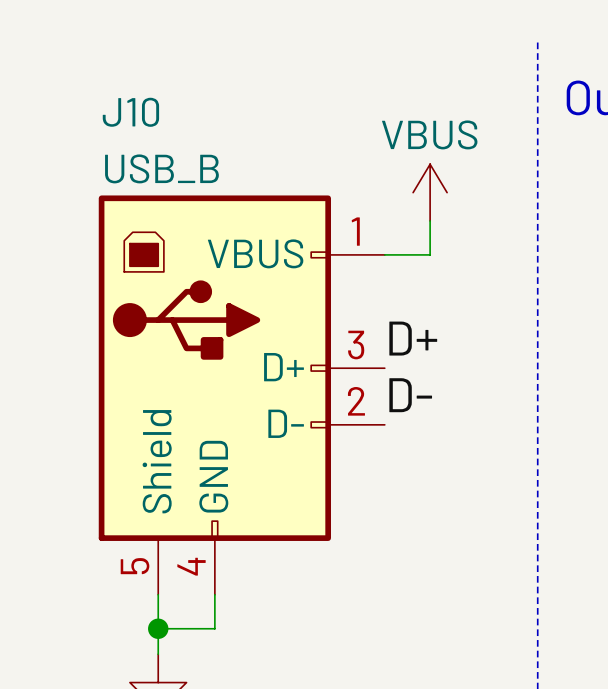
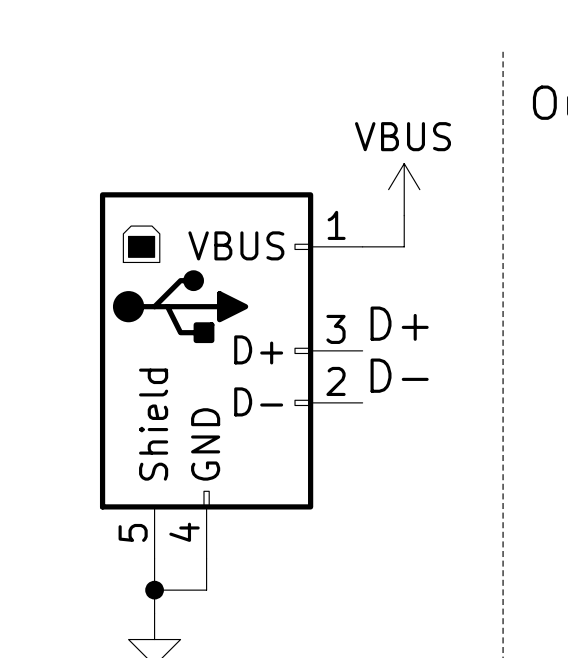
J10 name: J10 (130, 112) -> none
J10 value: USB_B (161, 168) -> none

